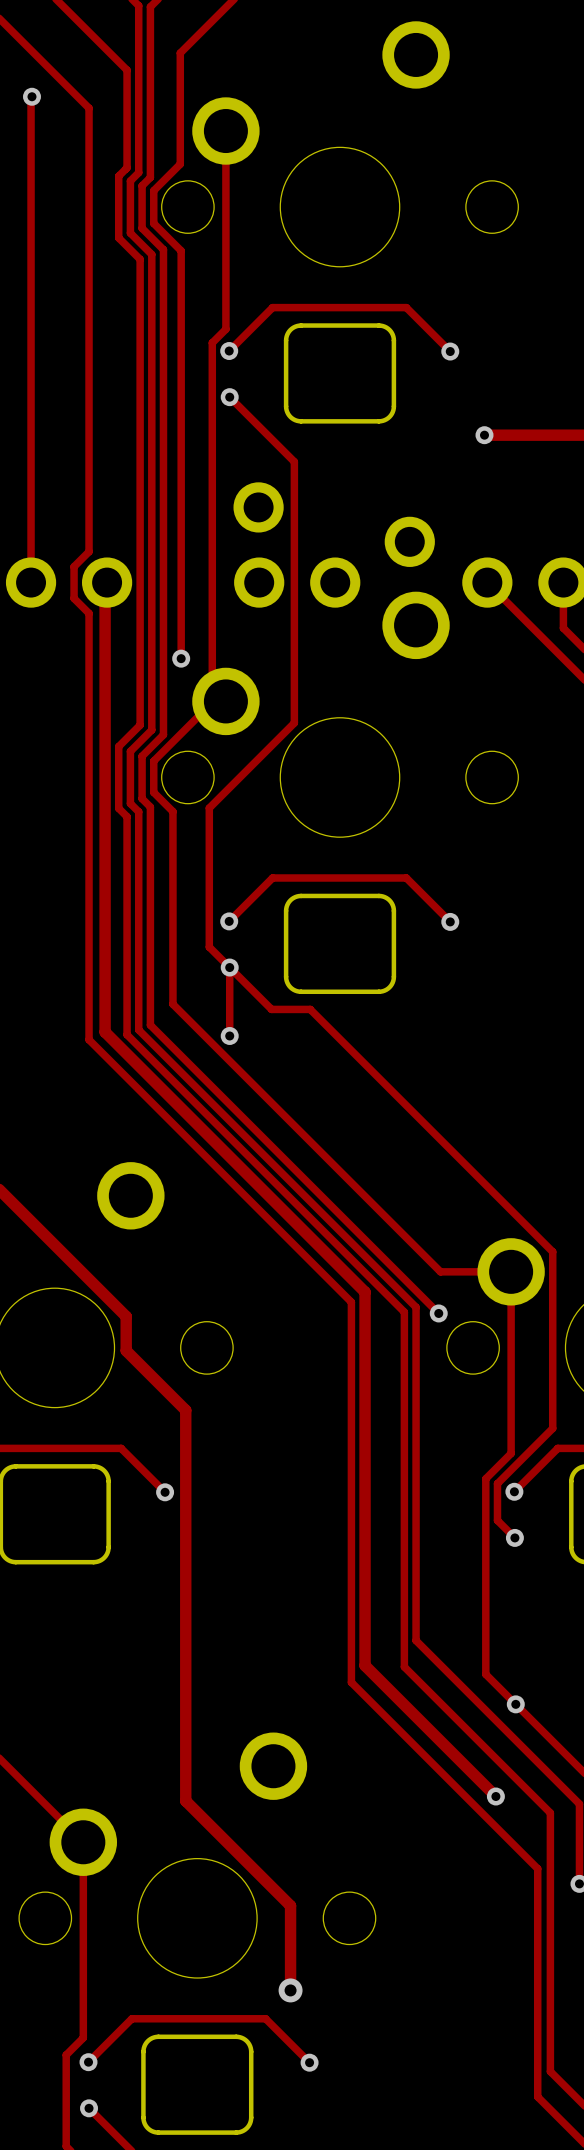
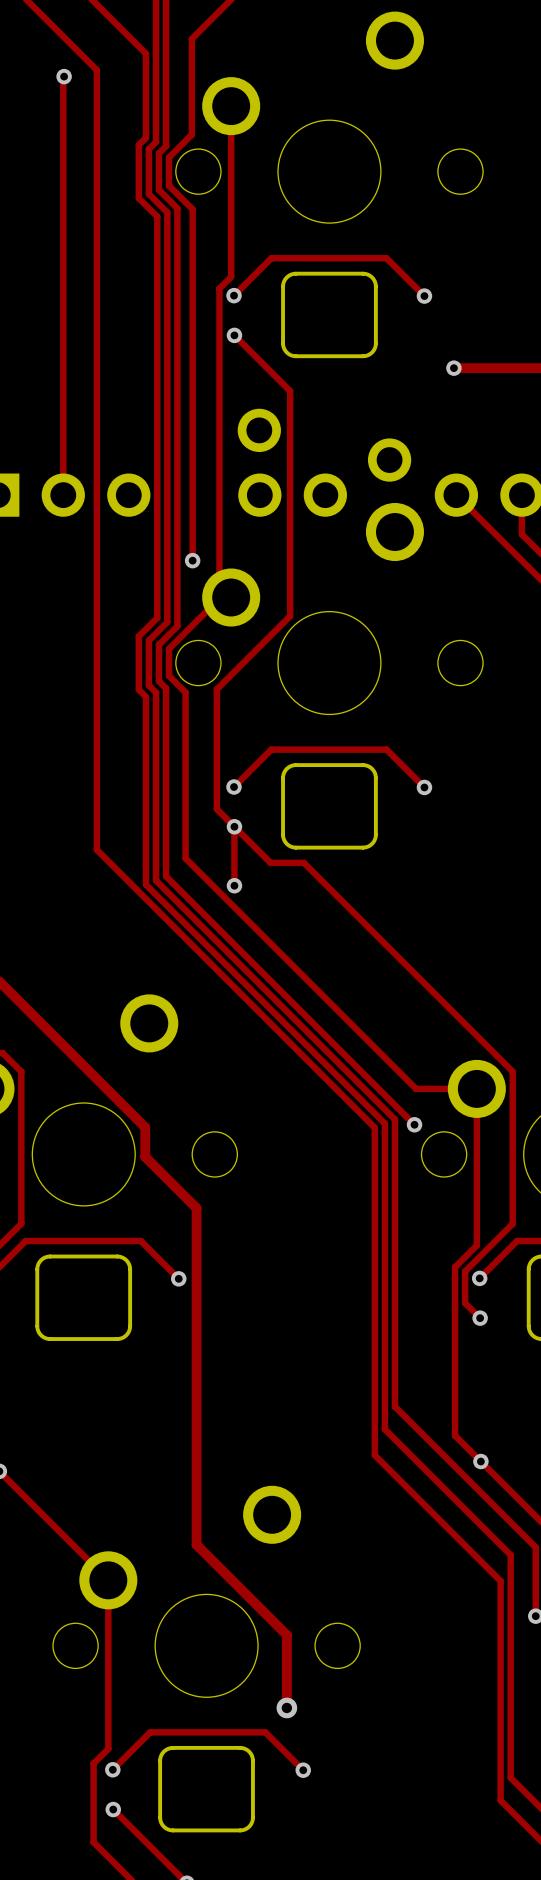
track: (70, 89) (89, 108) (89, 551) (74, 566) (74, 598) (89, 613) (89, 1039) (351, 1302) (351, 1682) (537, 1868) (538, 2097) -> (96, 70) (96, 849) (374, 1127) (374, 1455) (500, 1581) (500, 1800)
track: (107, 582) (105, 584) (105, 1032) (365, 1292) (365, 1665) (495, 1796) -> none
via: (495, 1796) -> none

